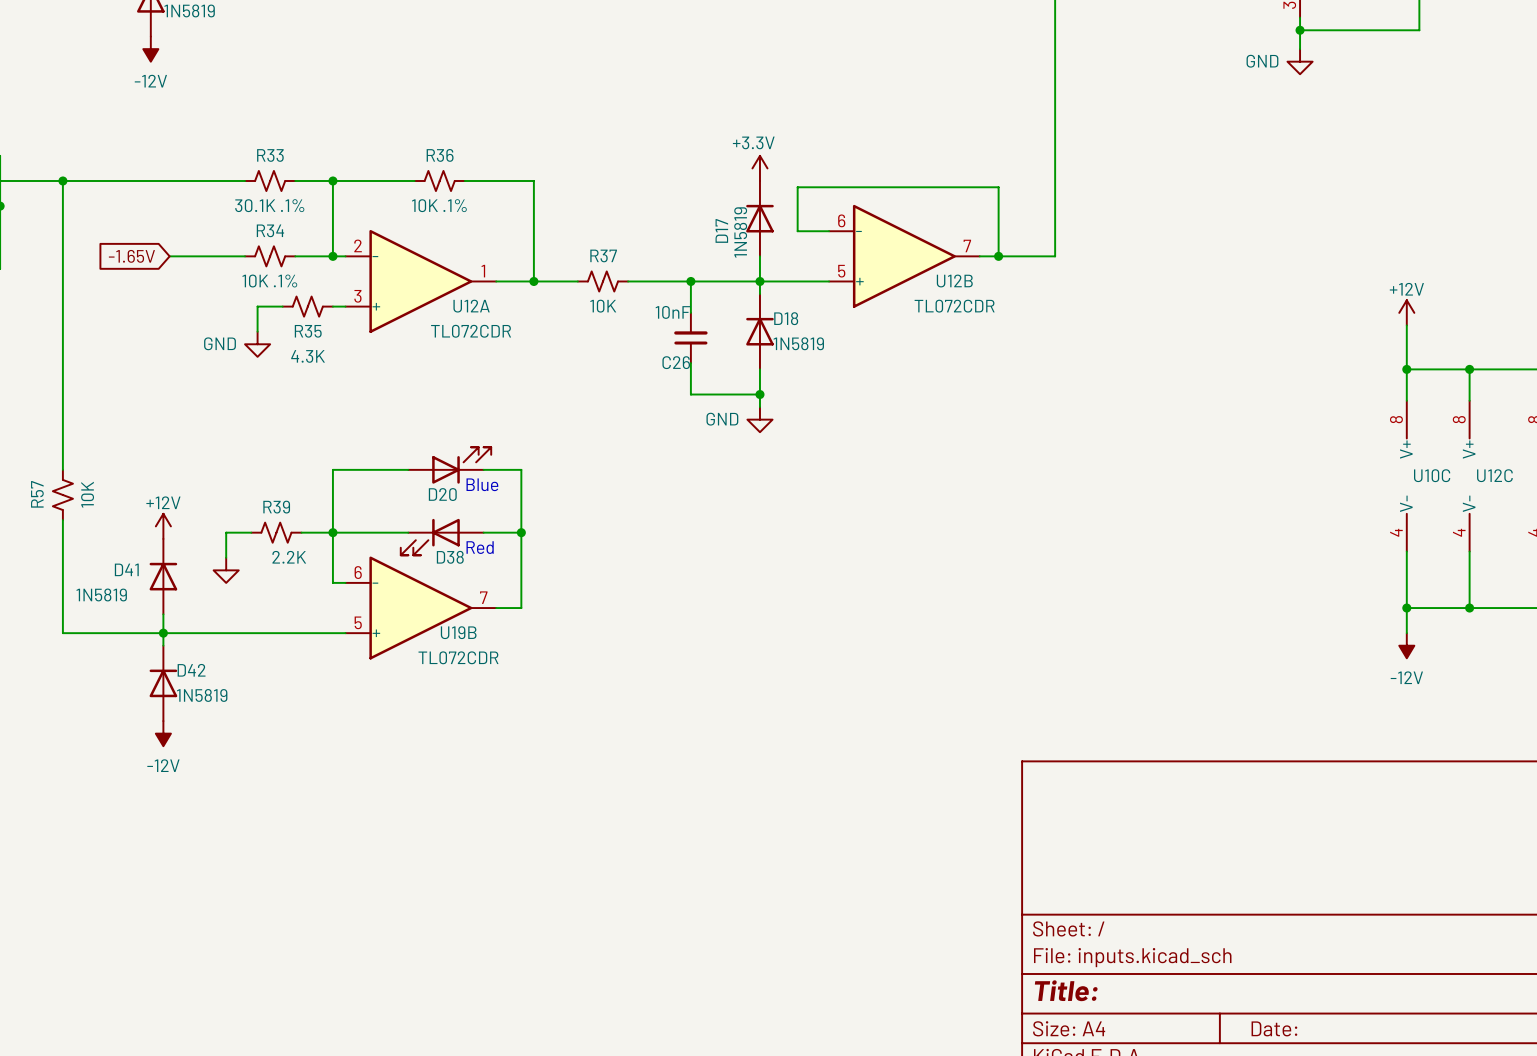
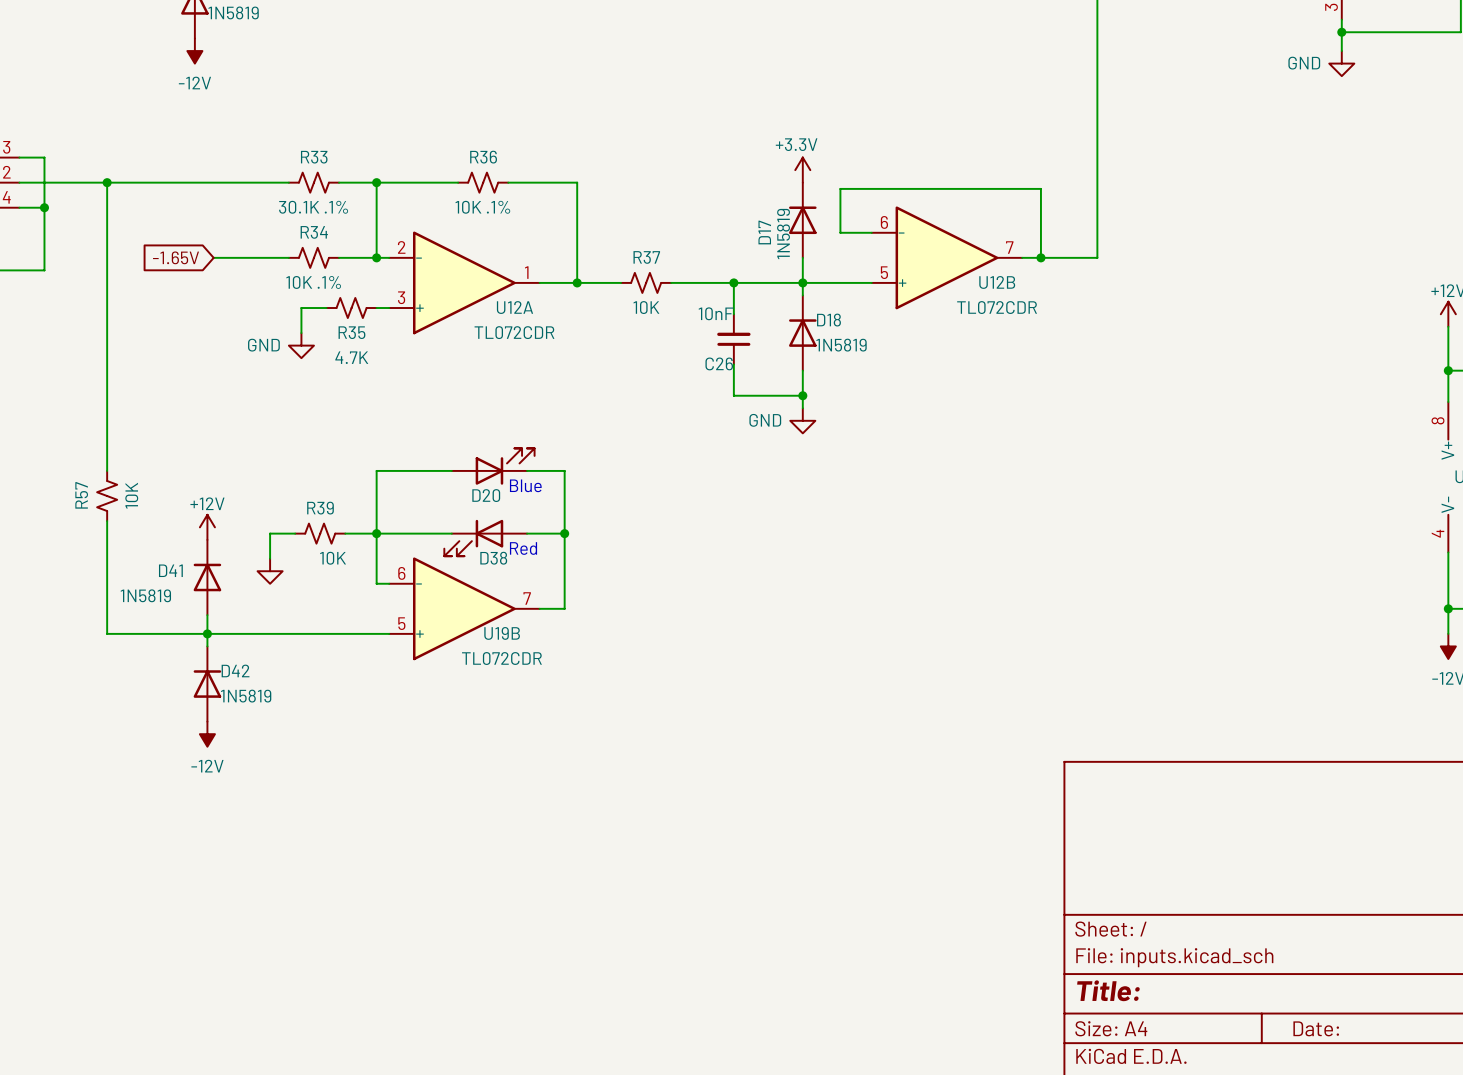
R35 value: 4.3K (308, 356) -> 4.7K (351, 357)
R39 value: 2.2K (289, 557) -> 10K (333, 558)

